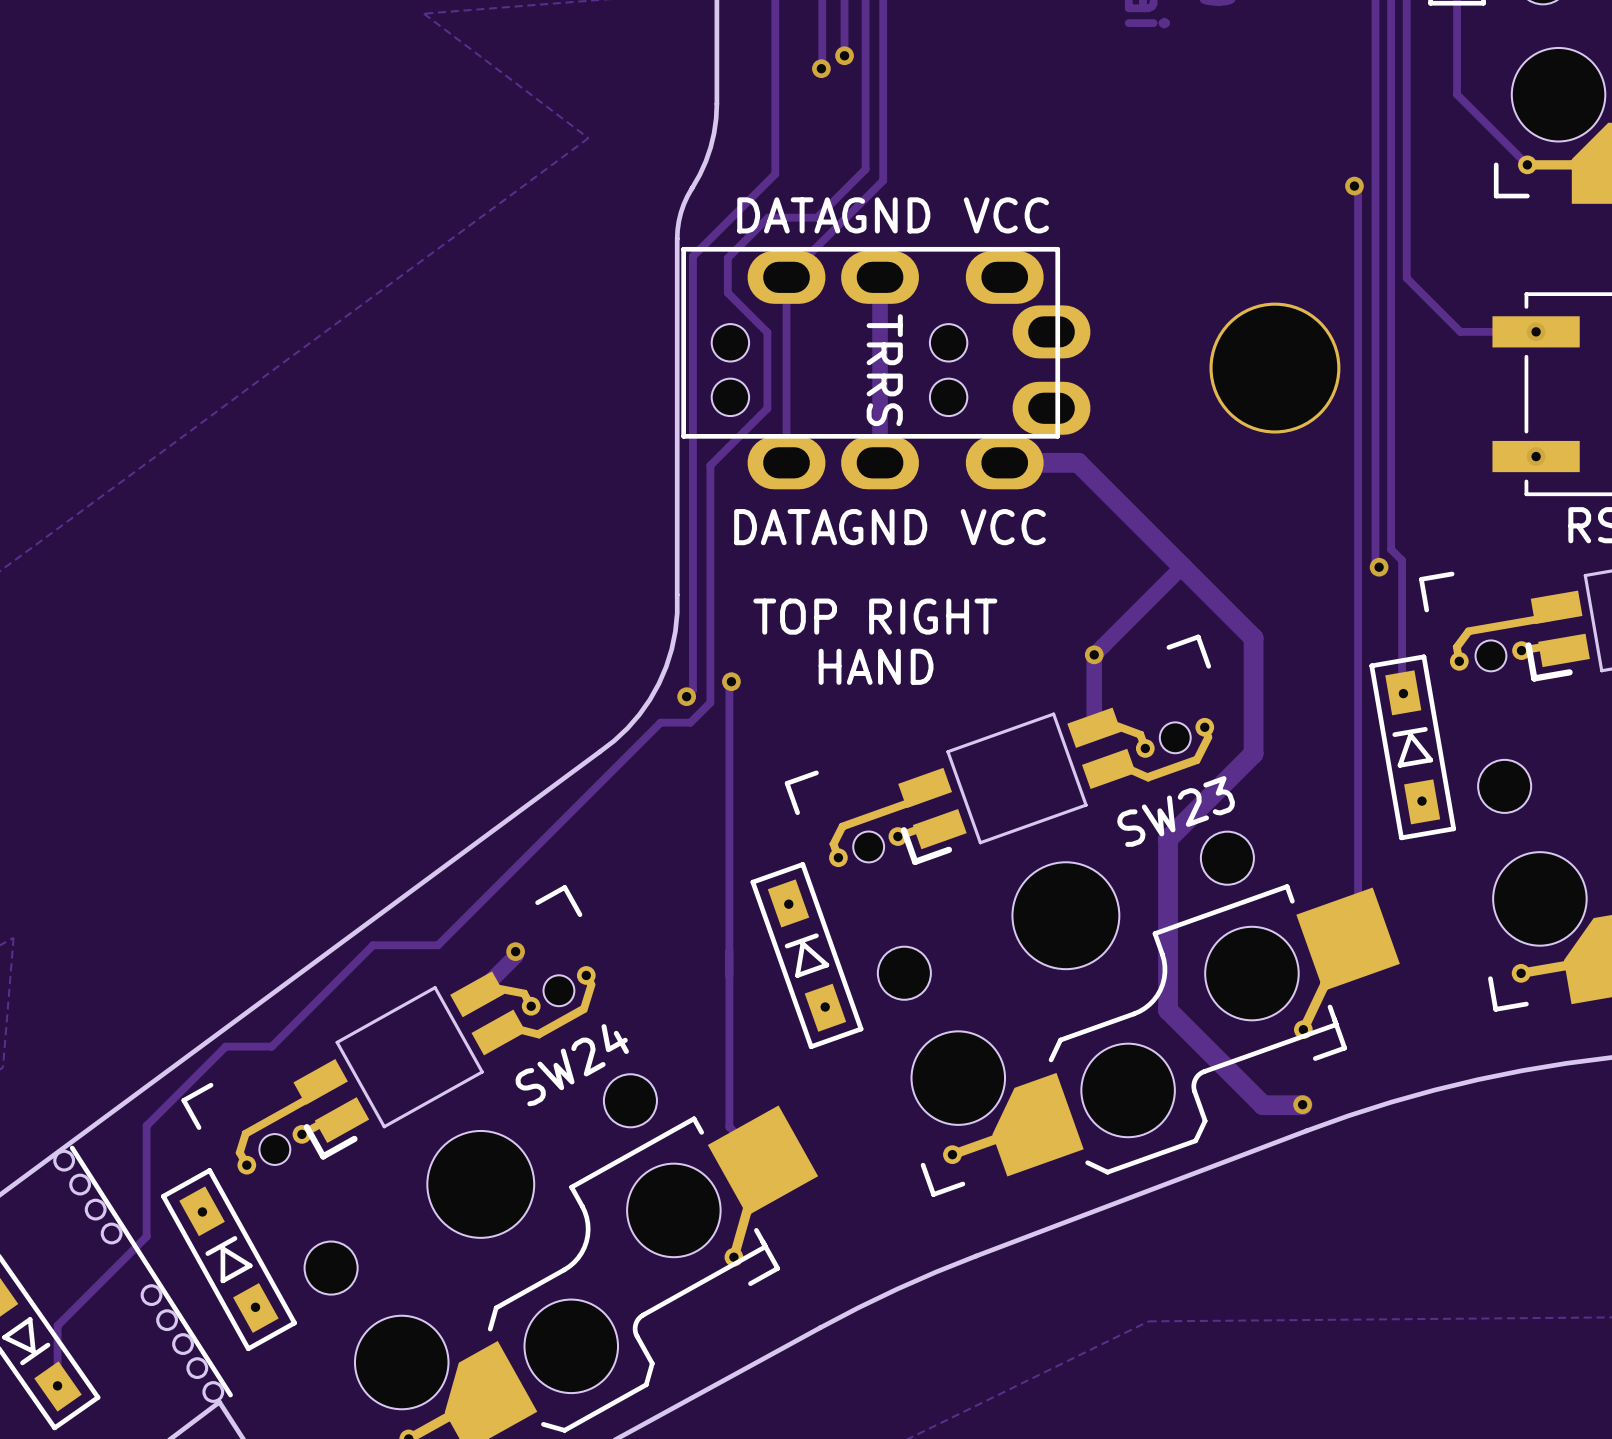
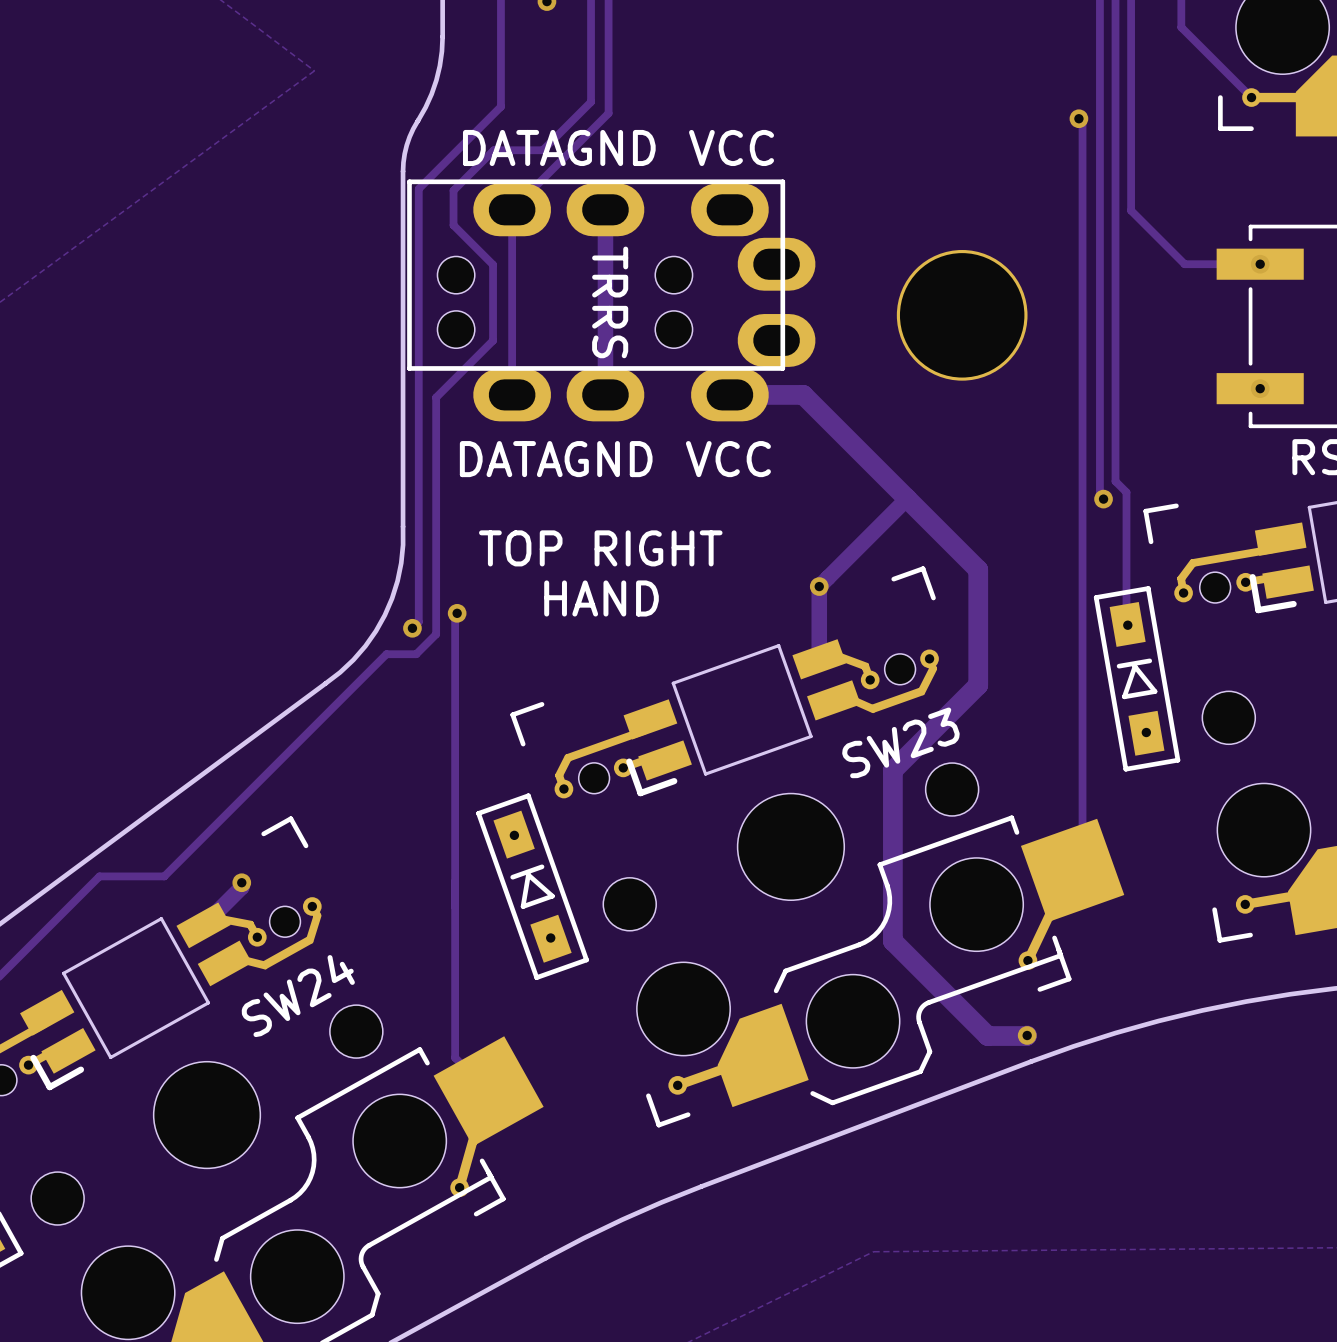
part position: (1274, 368) -> (962, 315)

